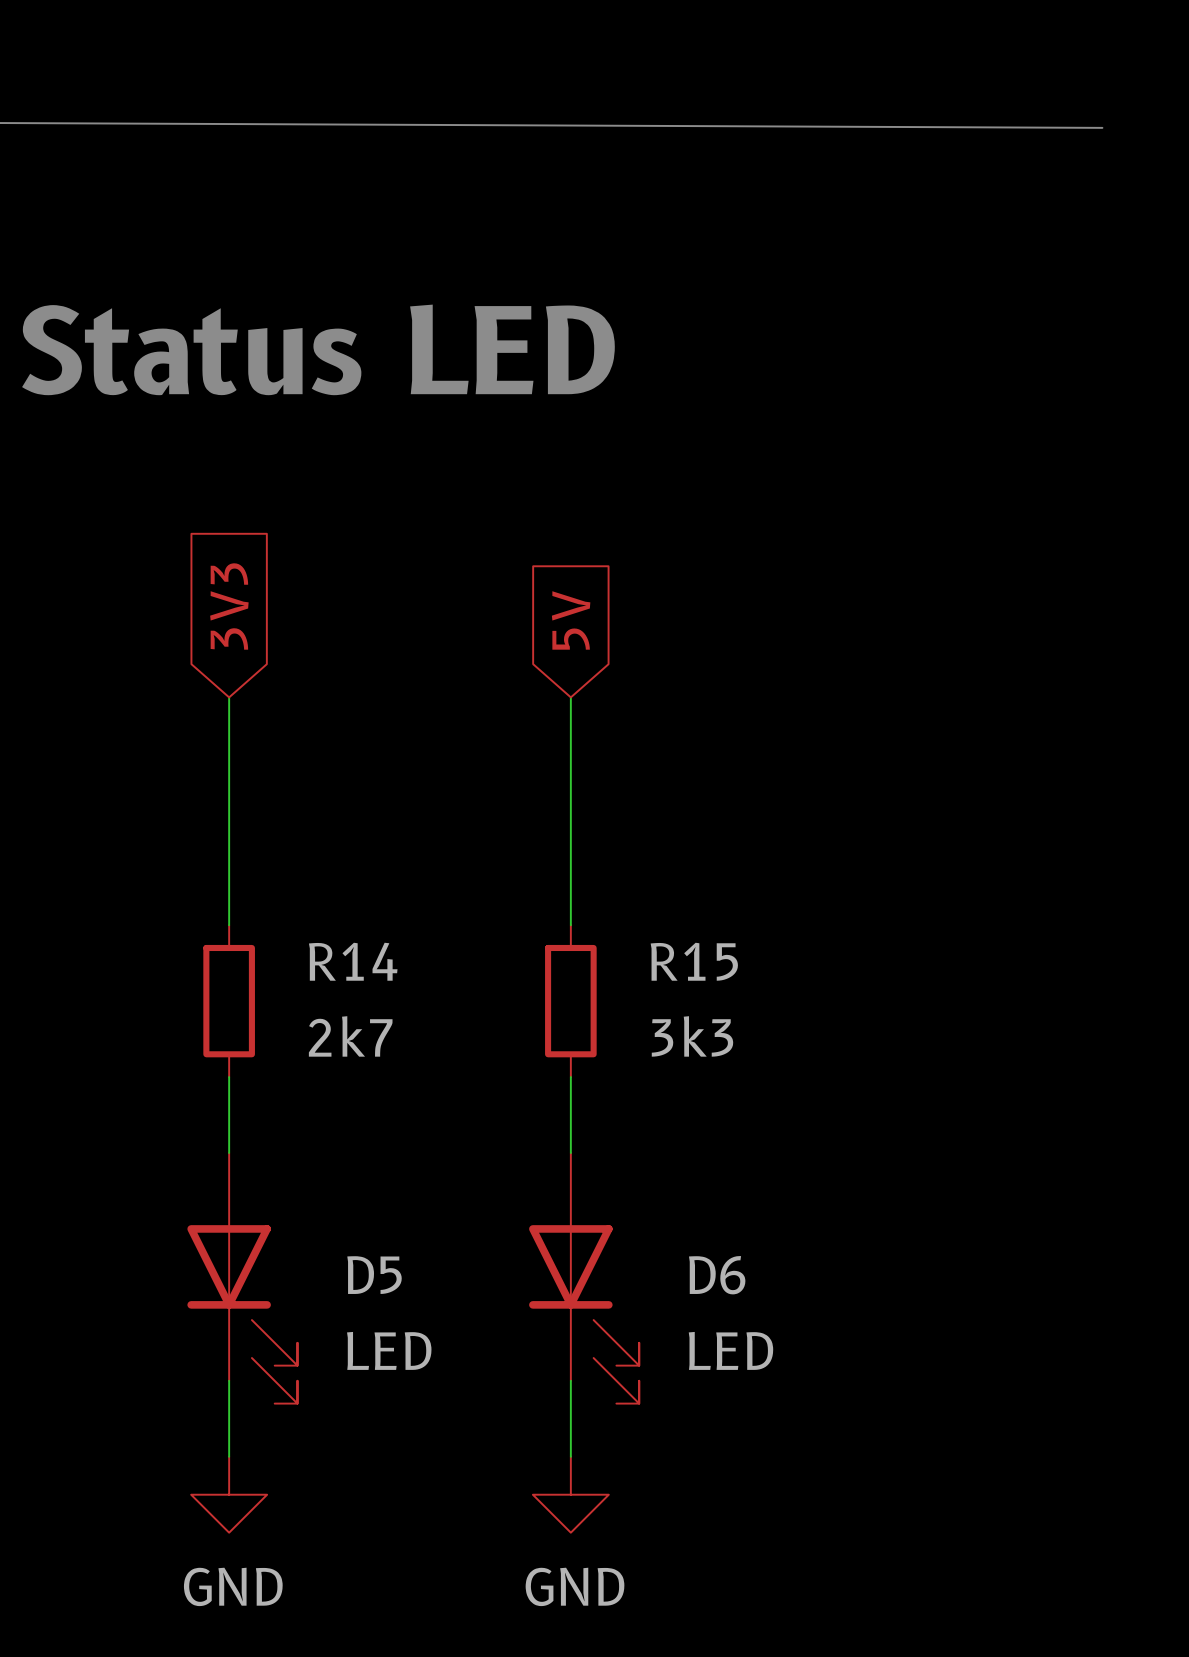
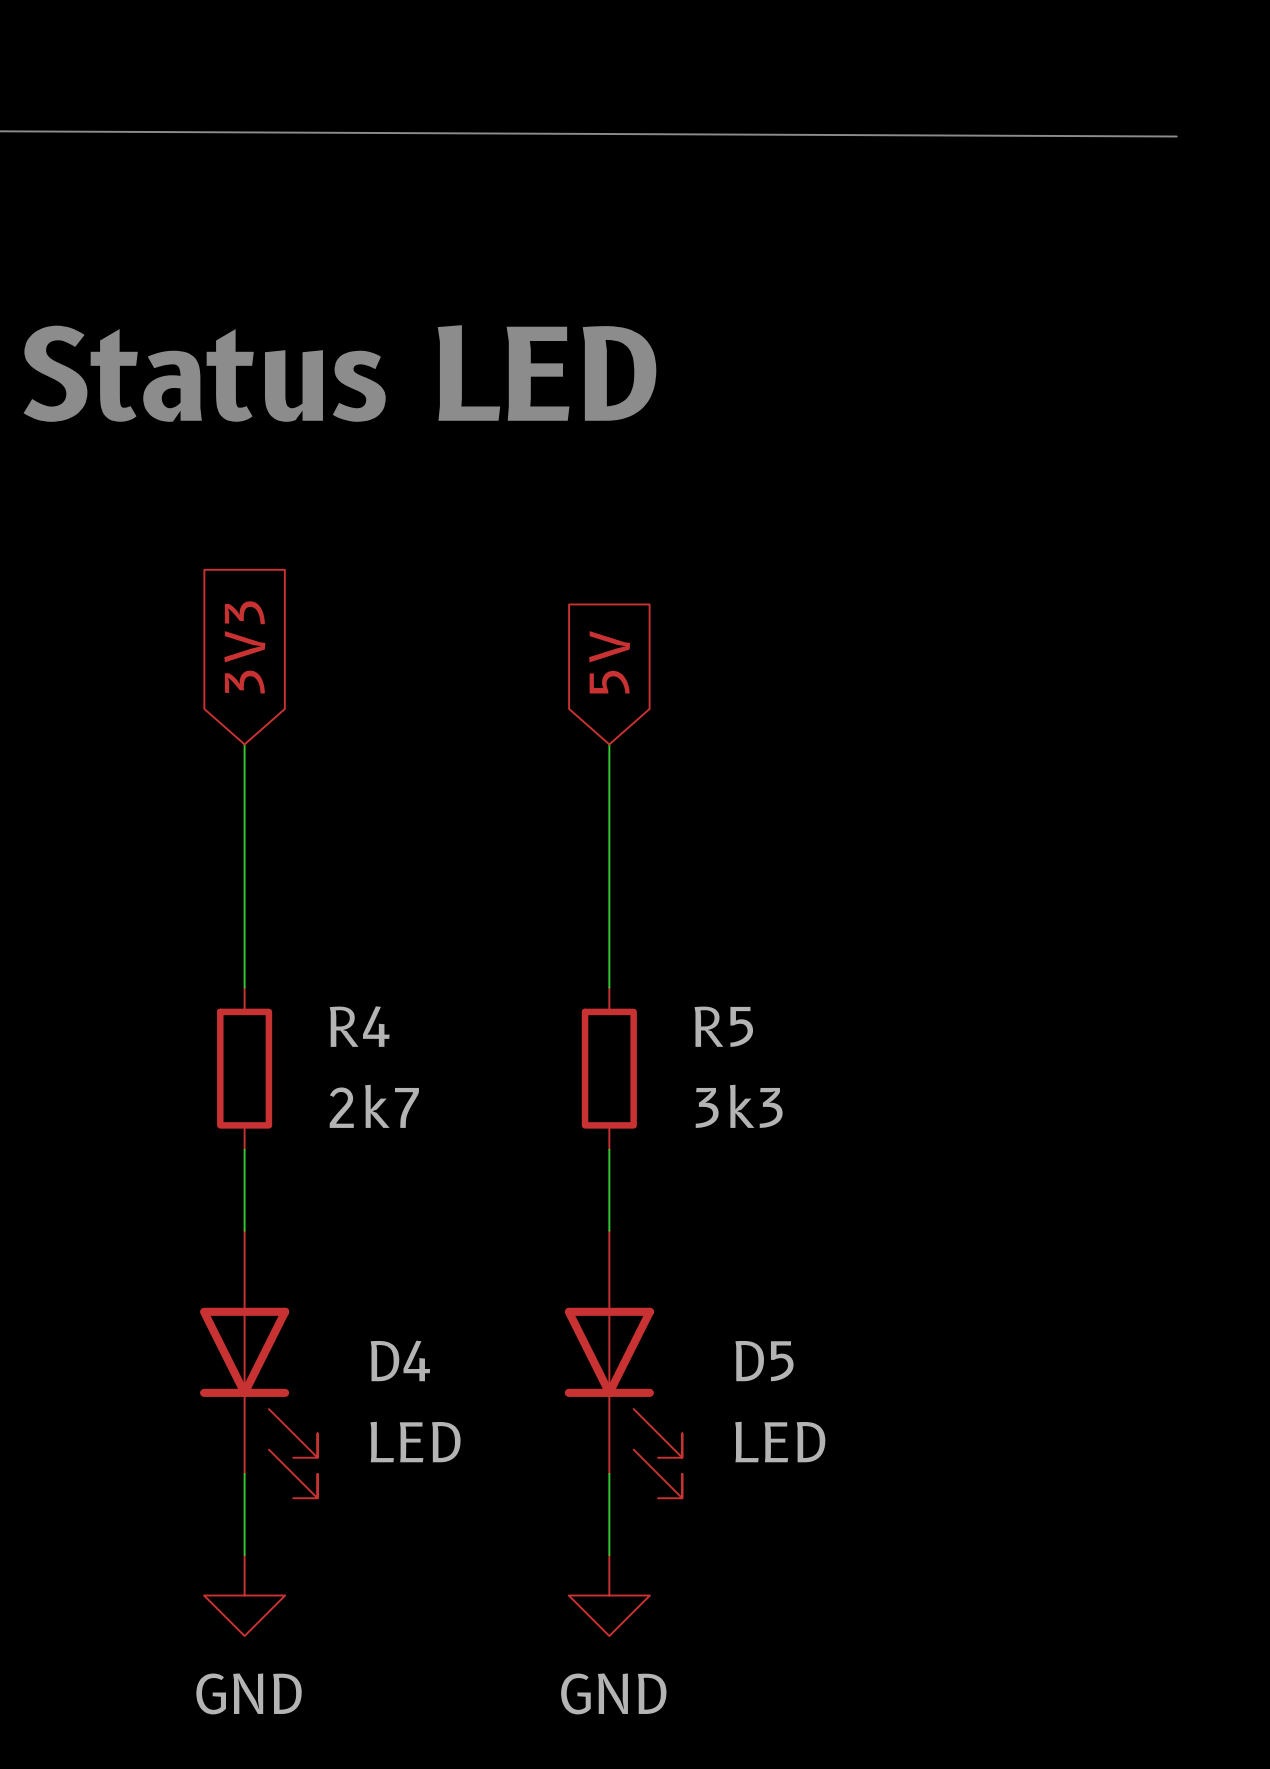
R14 name: R14 (353, 961) -> R4 (359, 1026)
R15 name: R15 (694, 961) -> R5 (723, 1026)
D5 name: D5 (374, 1275) -> D4 (400, 1360)
D6 name: D6 (717, 1275) -> D5 (764, 1361)

